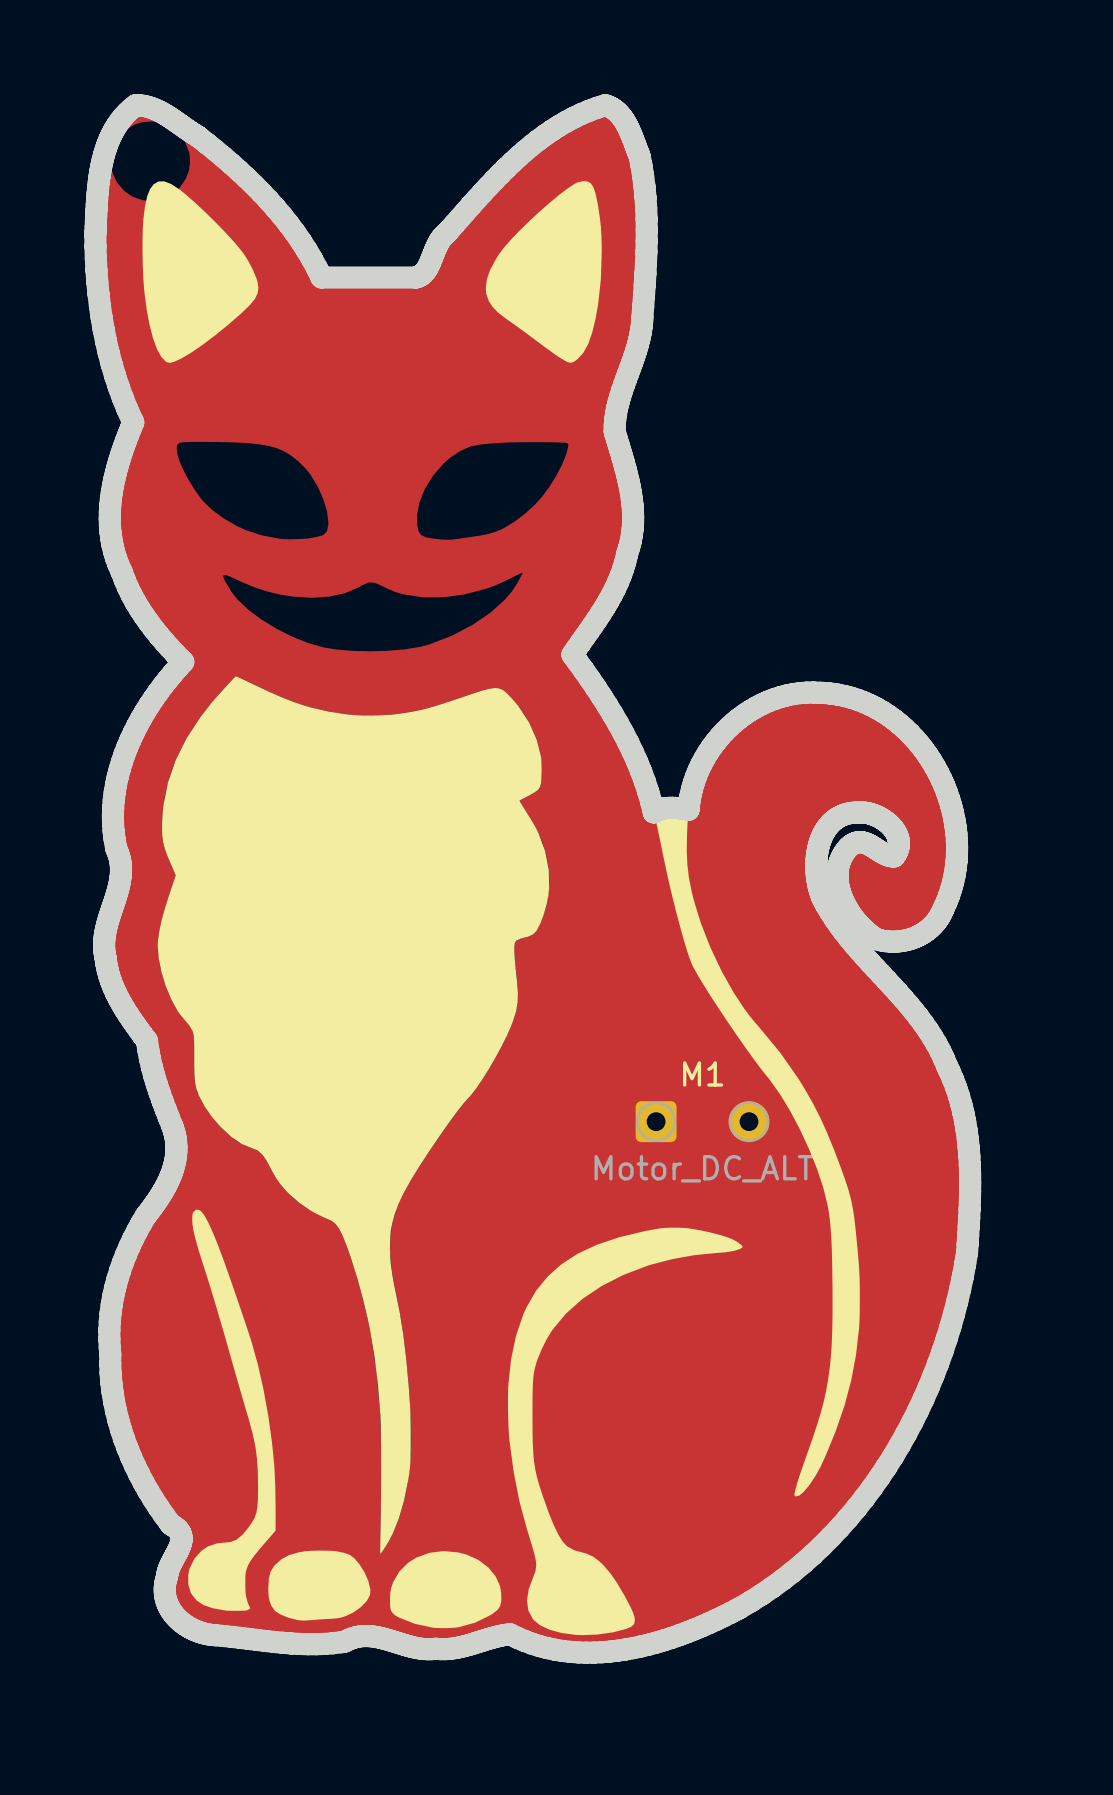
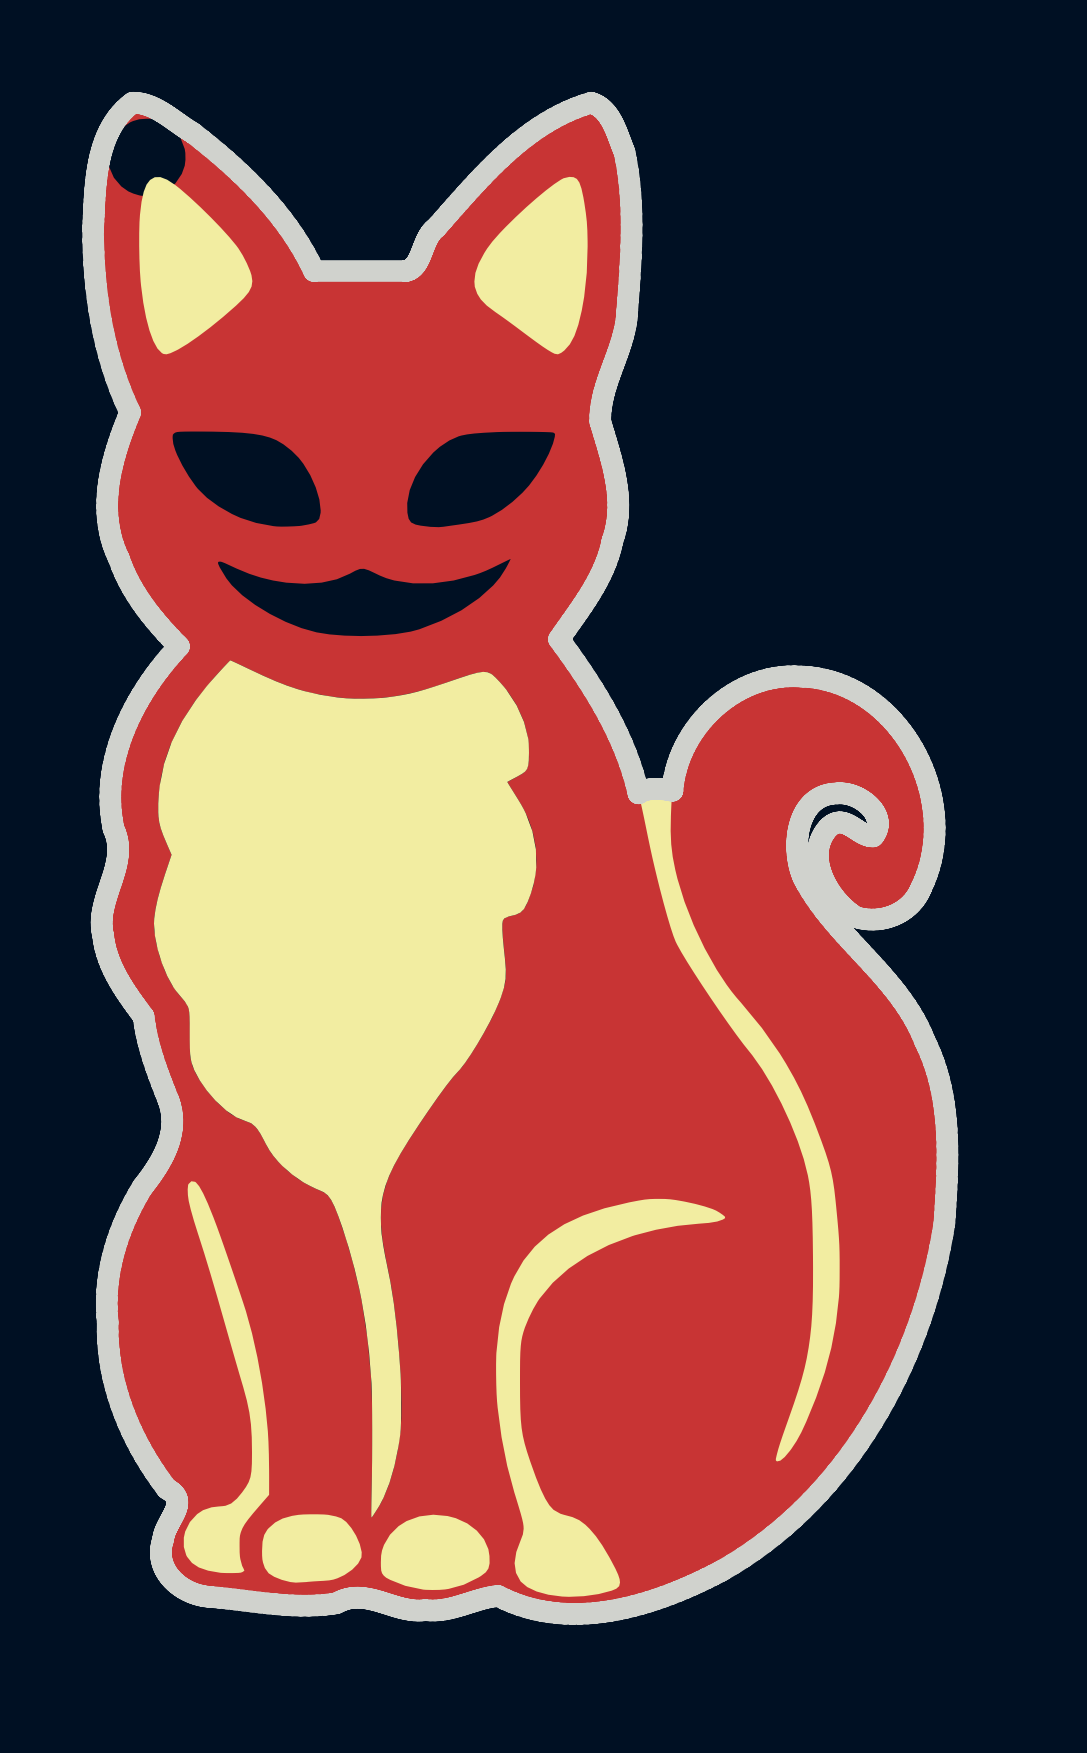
M1: Motor_DC_ALT (702, 1121) -> none

